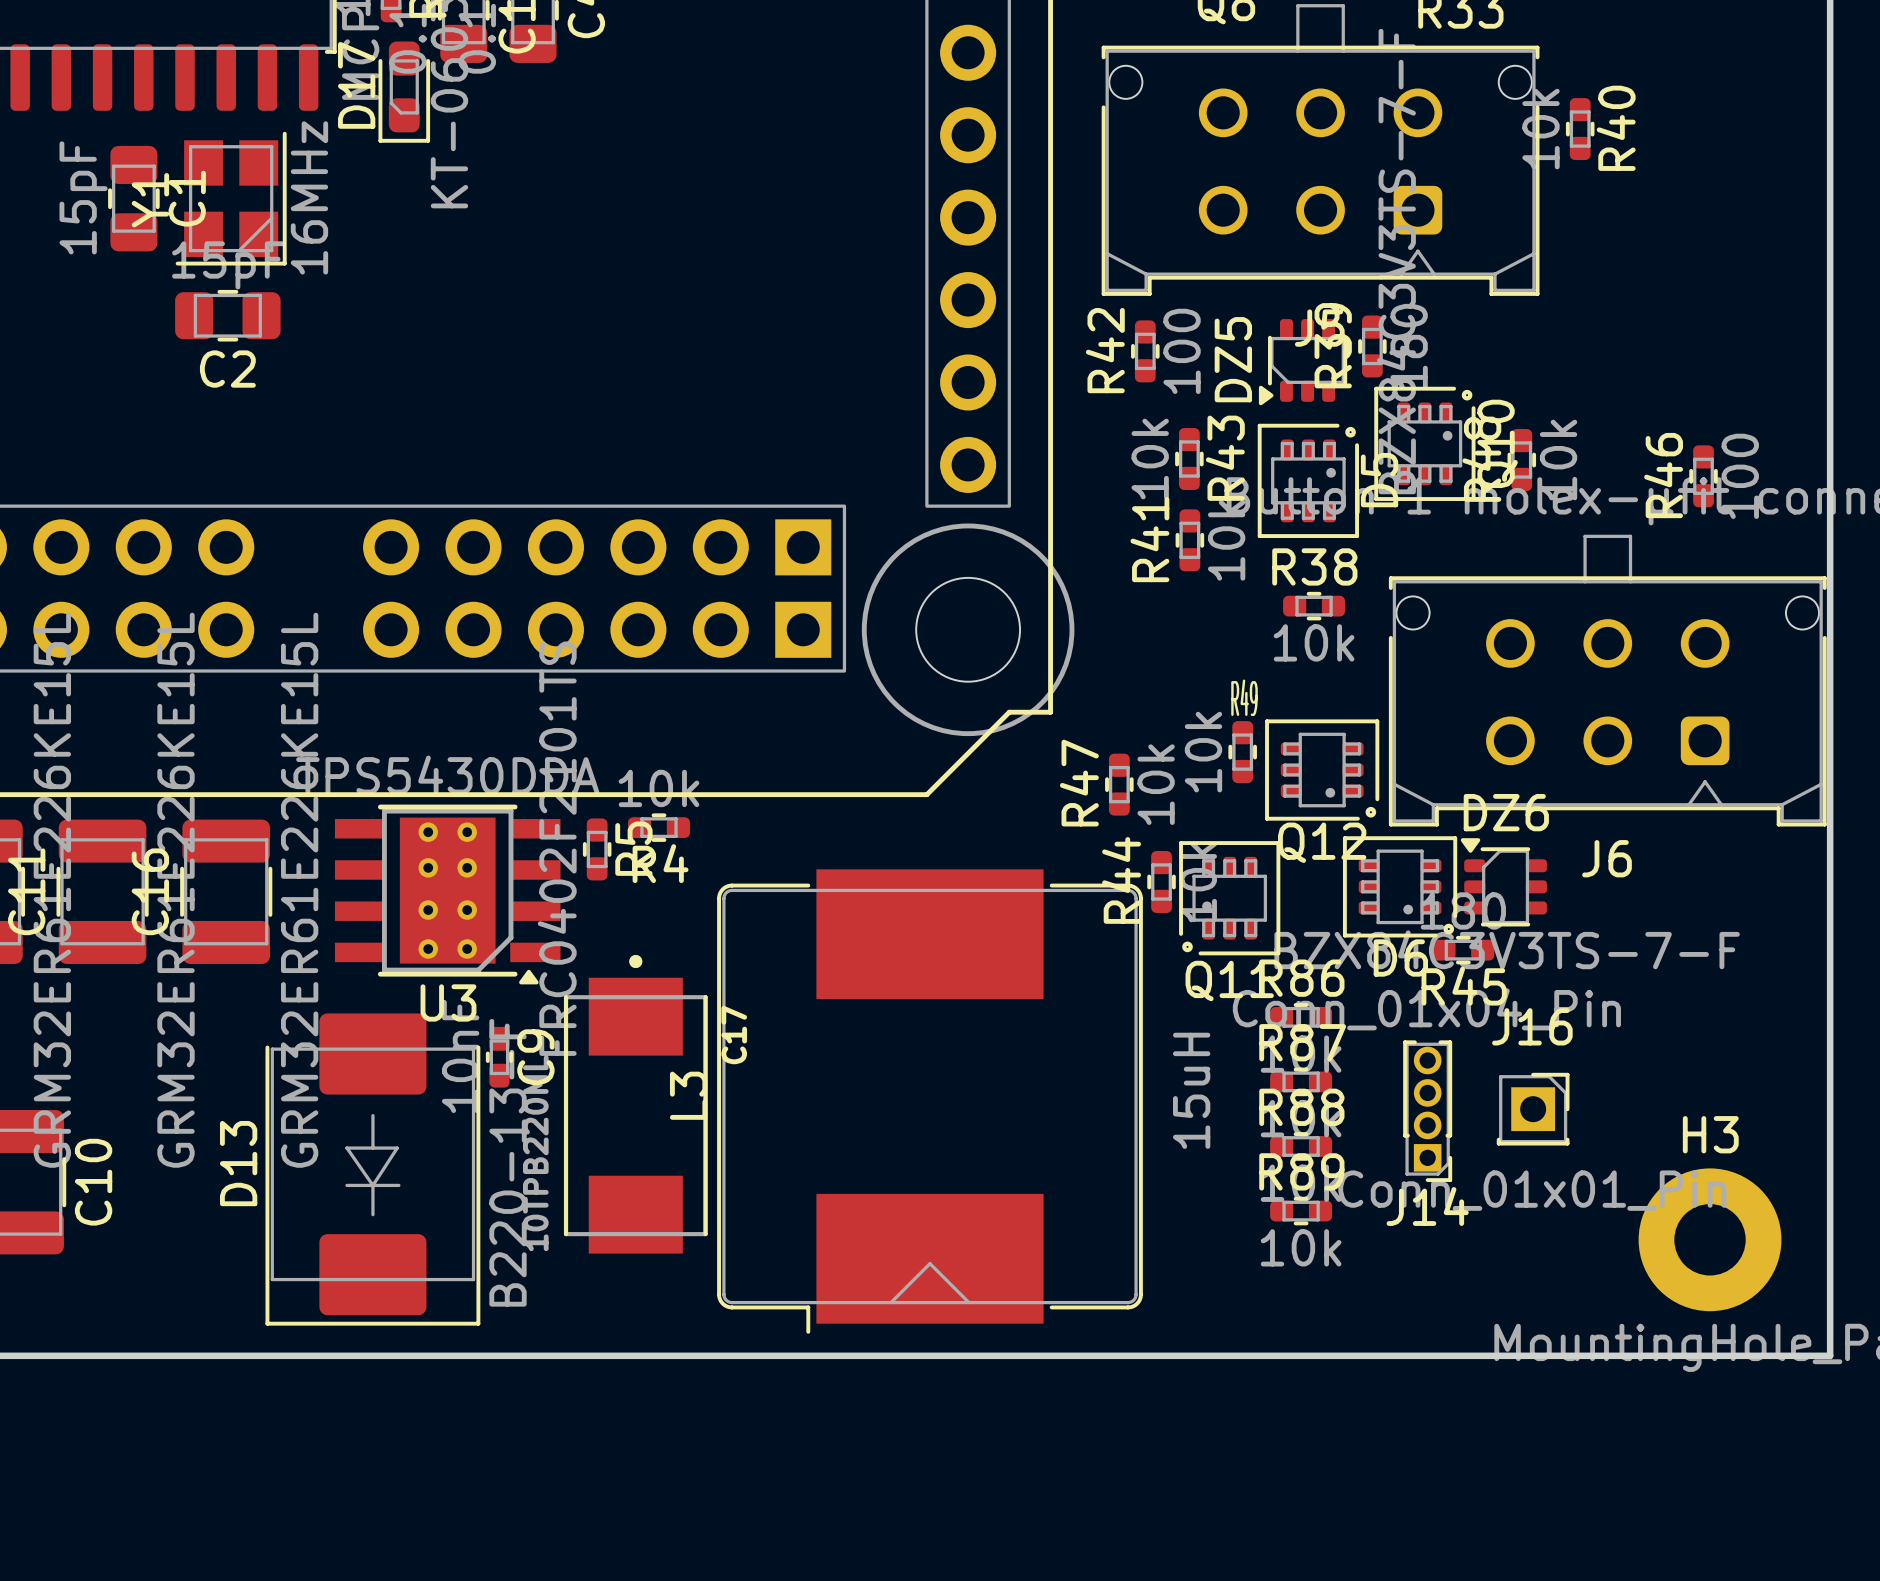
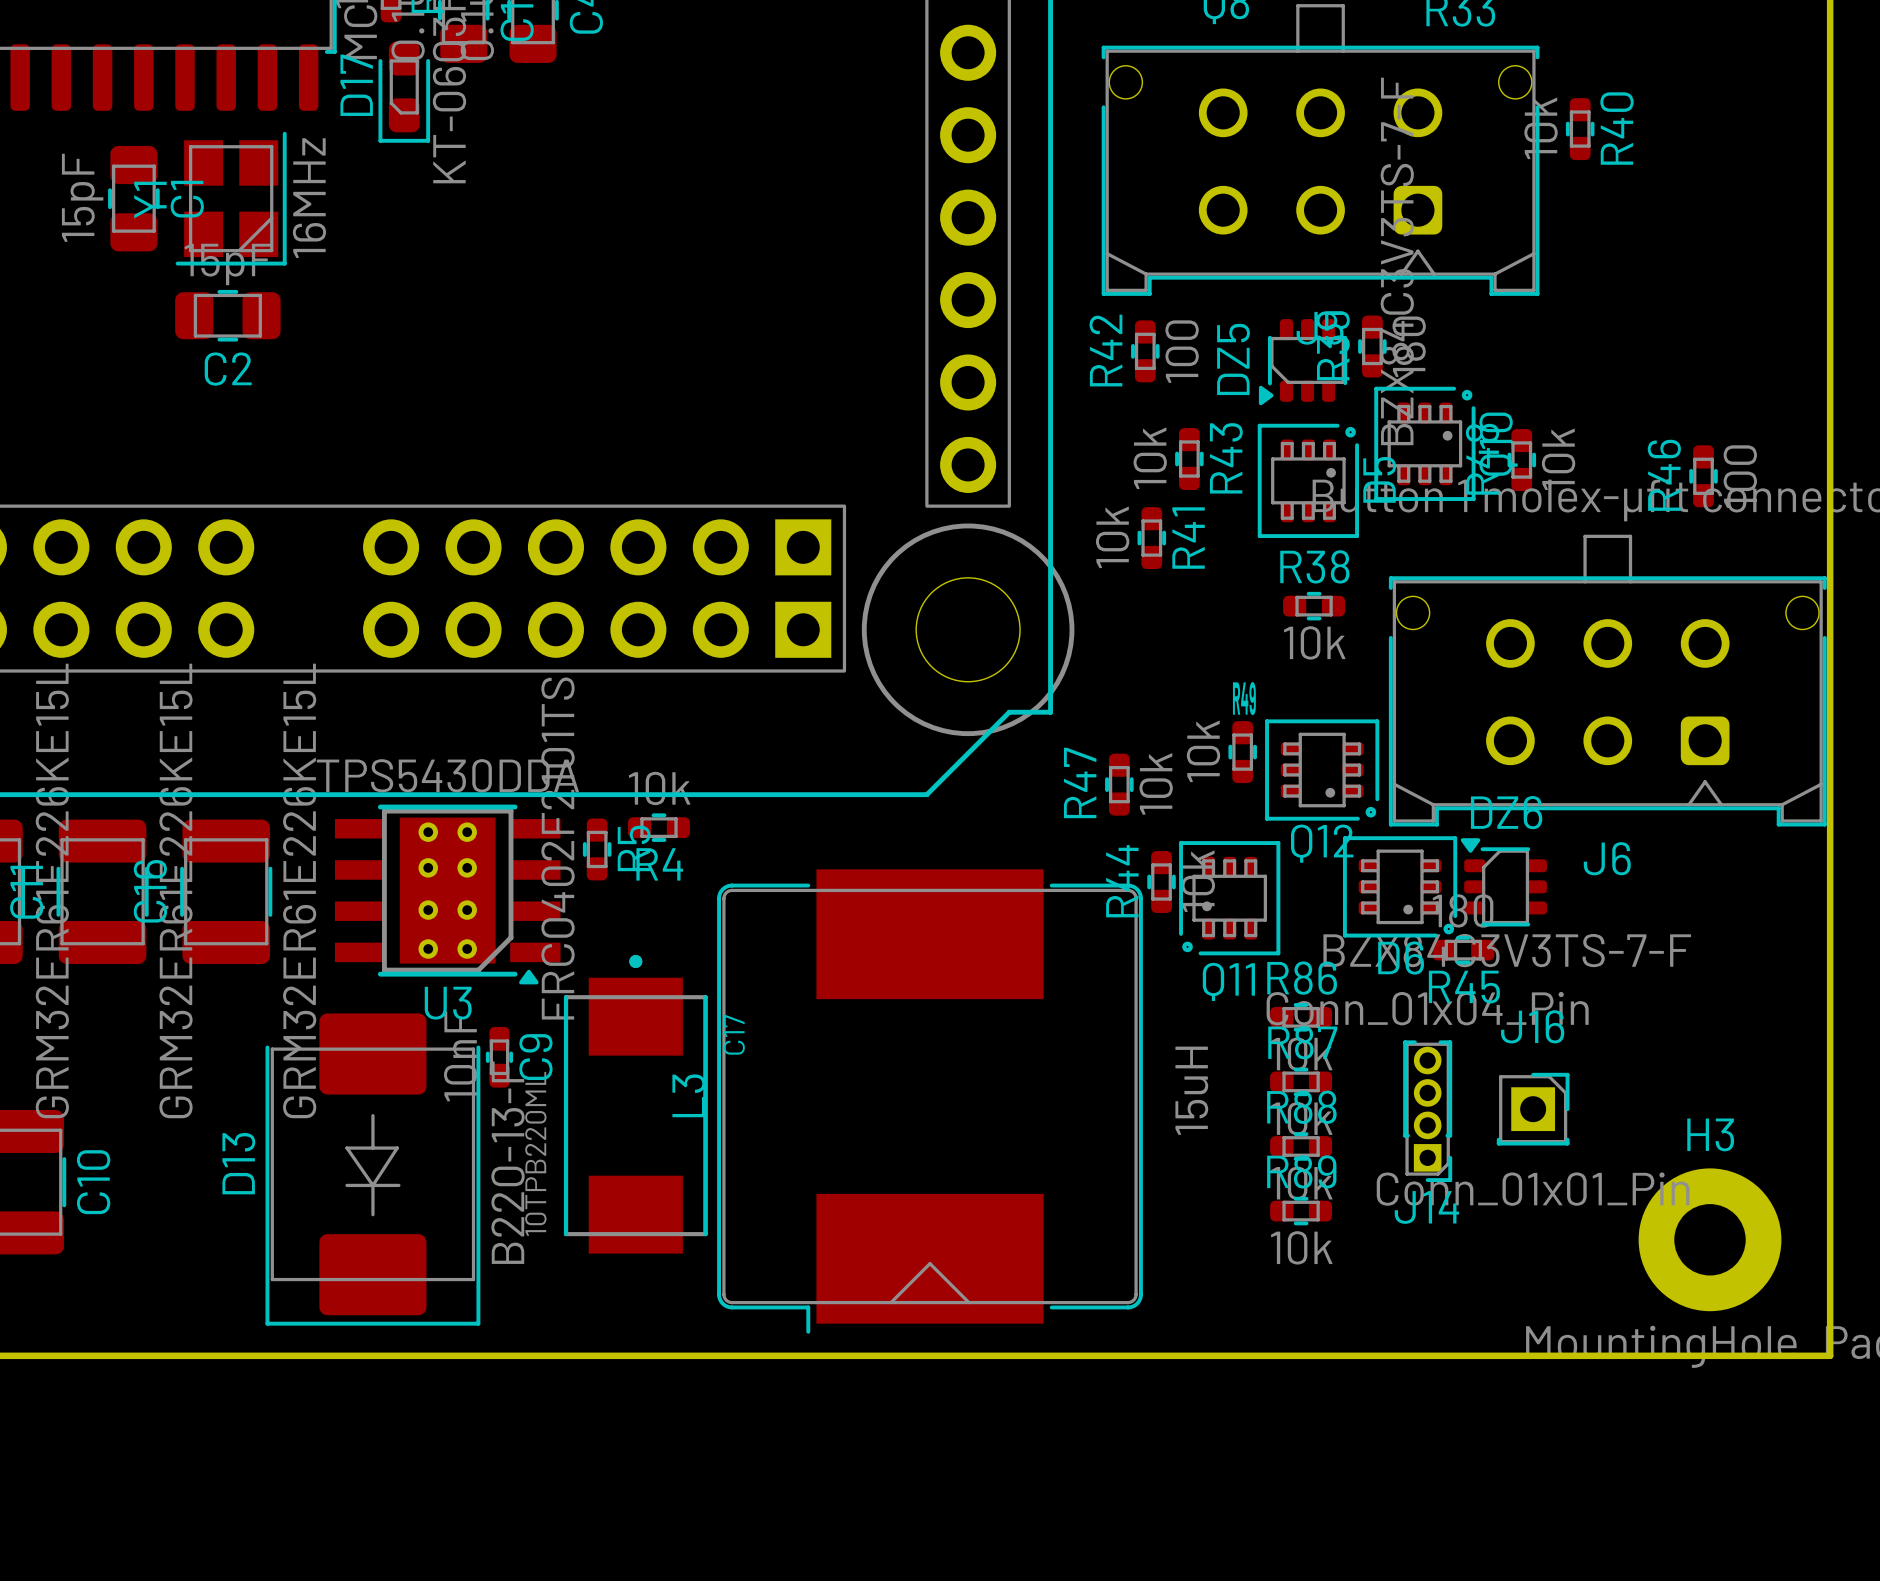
R41 name position: R41 (1149, 539) -> R41 (1188, 538)
R41 position: (1189, 540) -> (1151, 538)
R41 value position: 10k (1226, 540) -> 10k (1112, 537)

